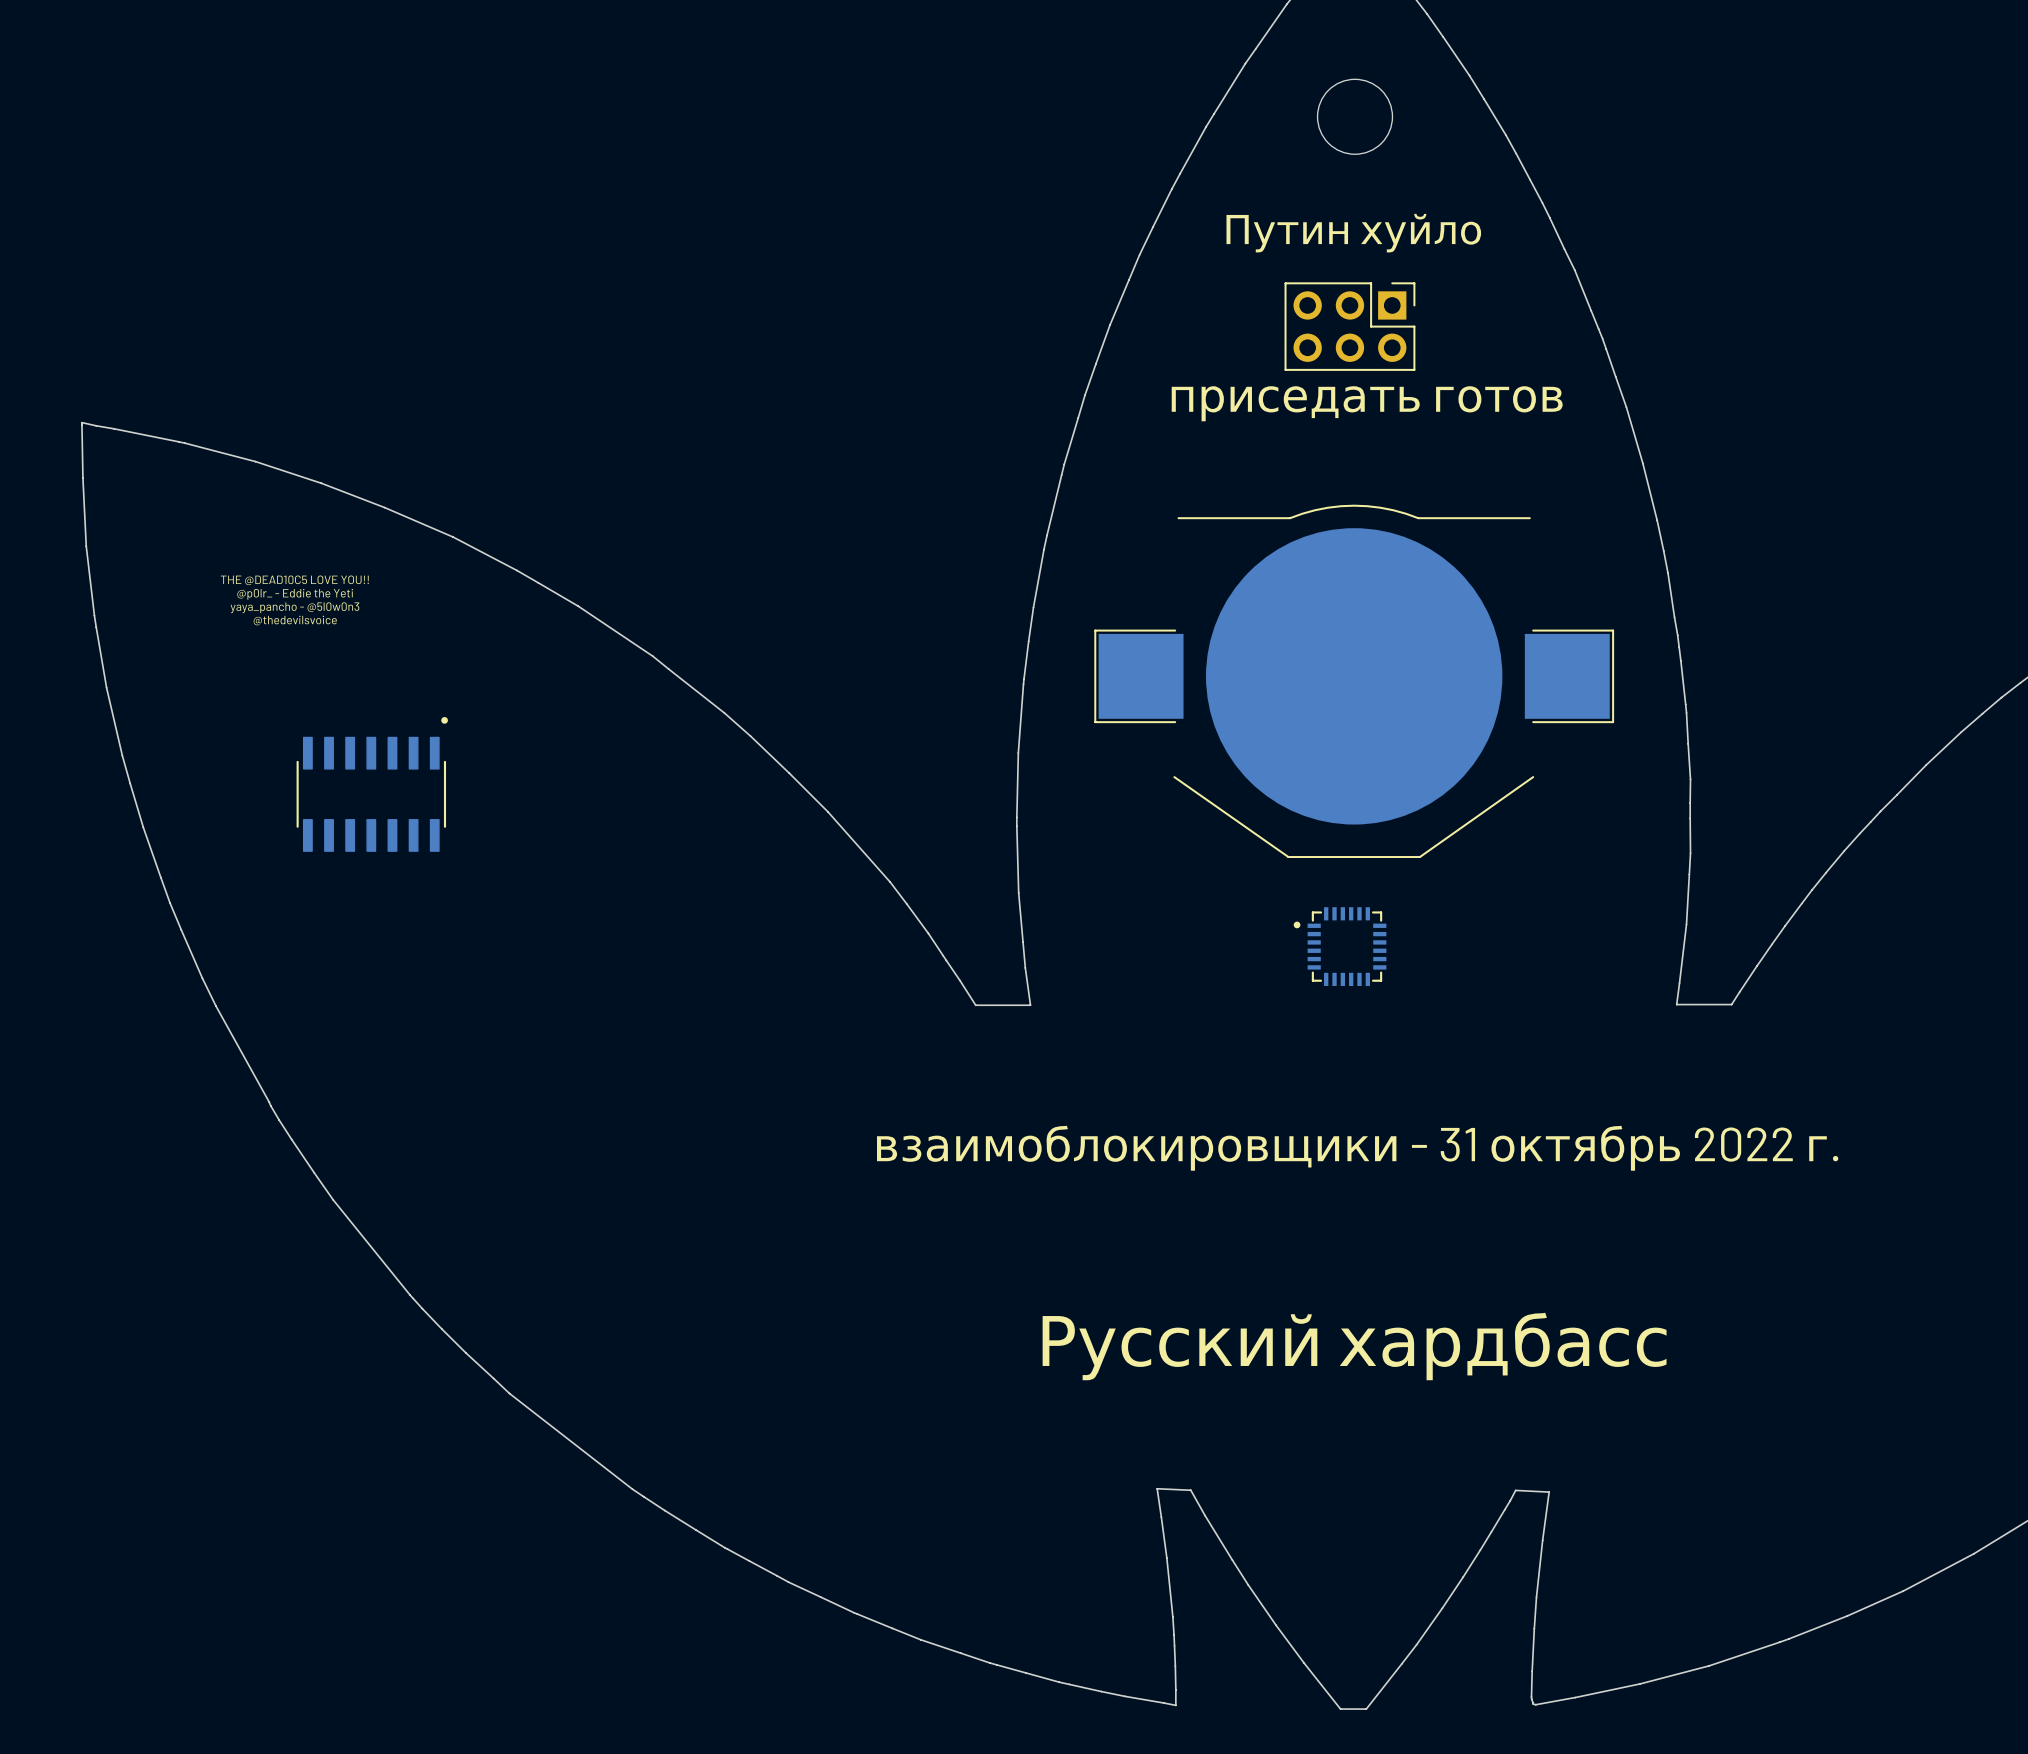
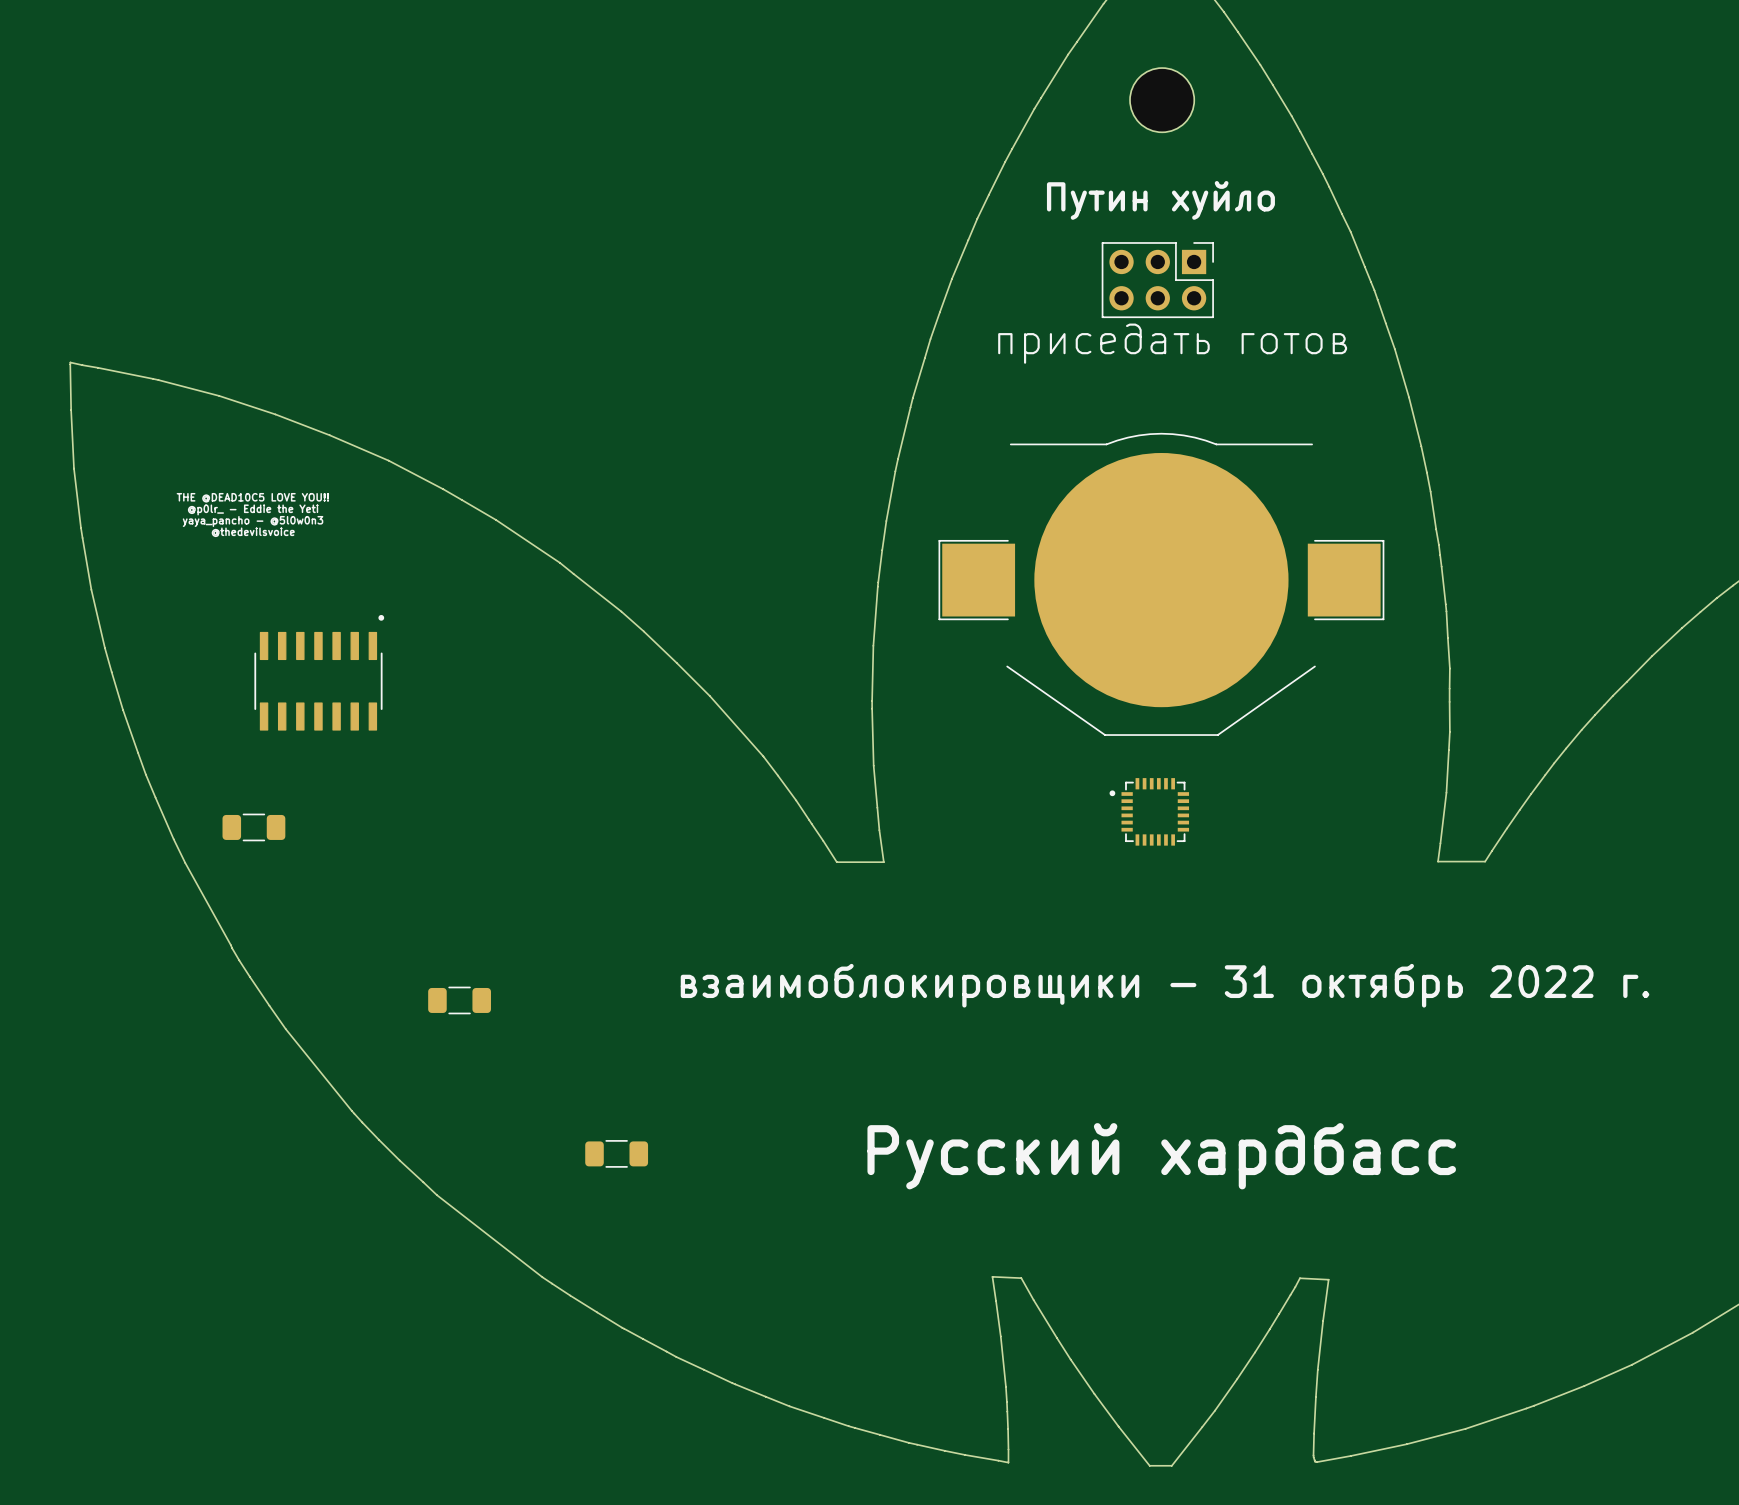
part: none -> (253, 827)
part: none -> (459, 1000)
part: none -> (616, 1153)

